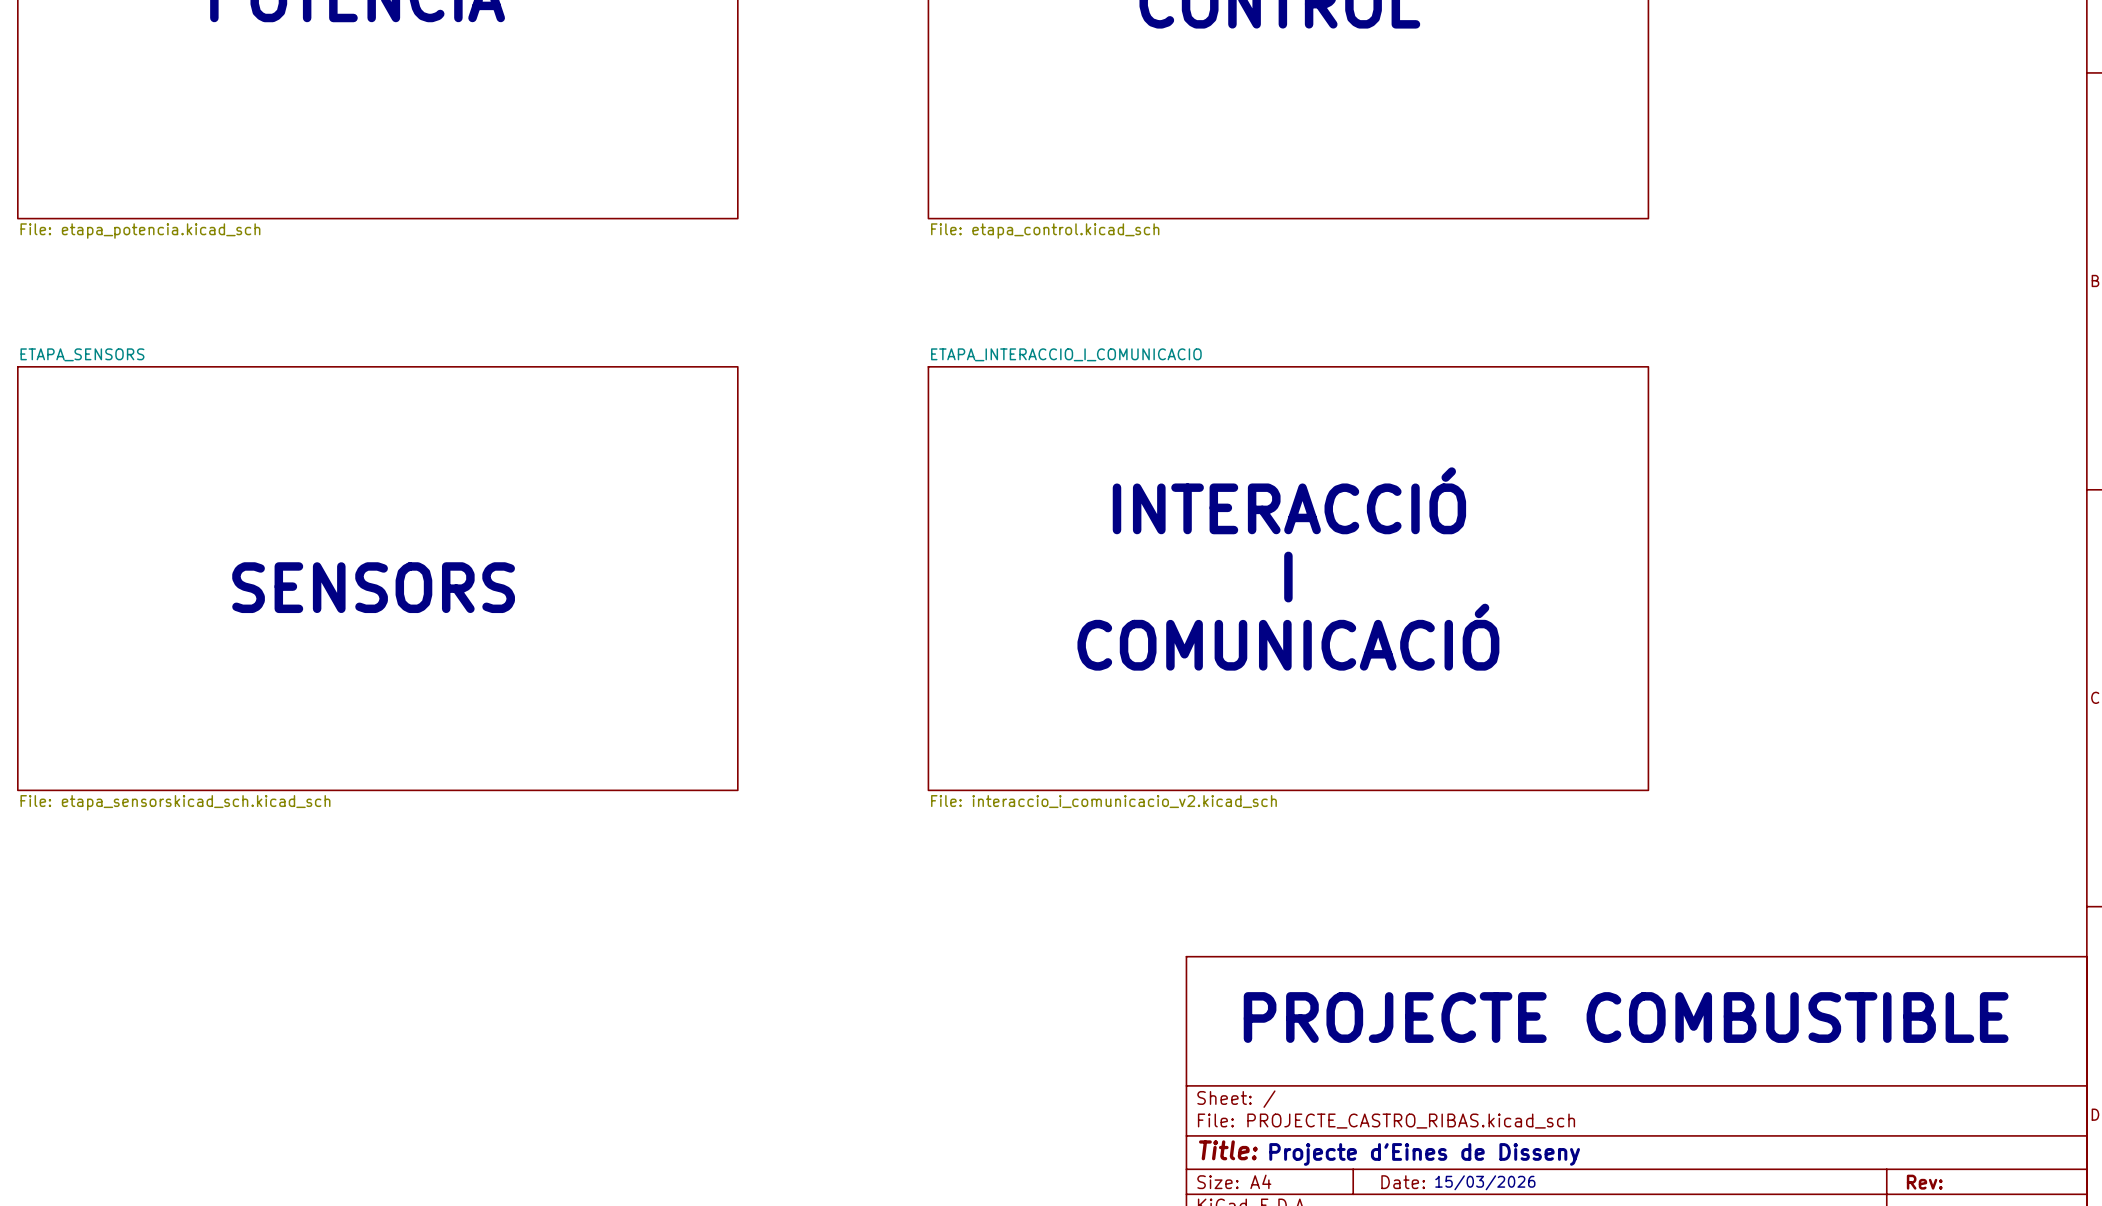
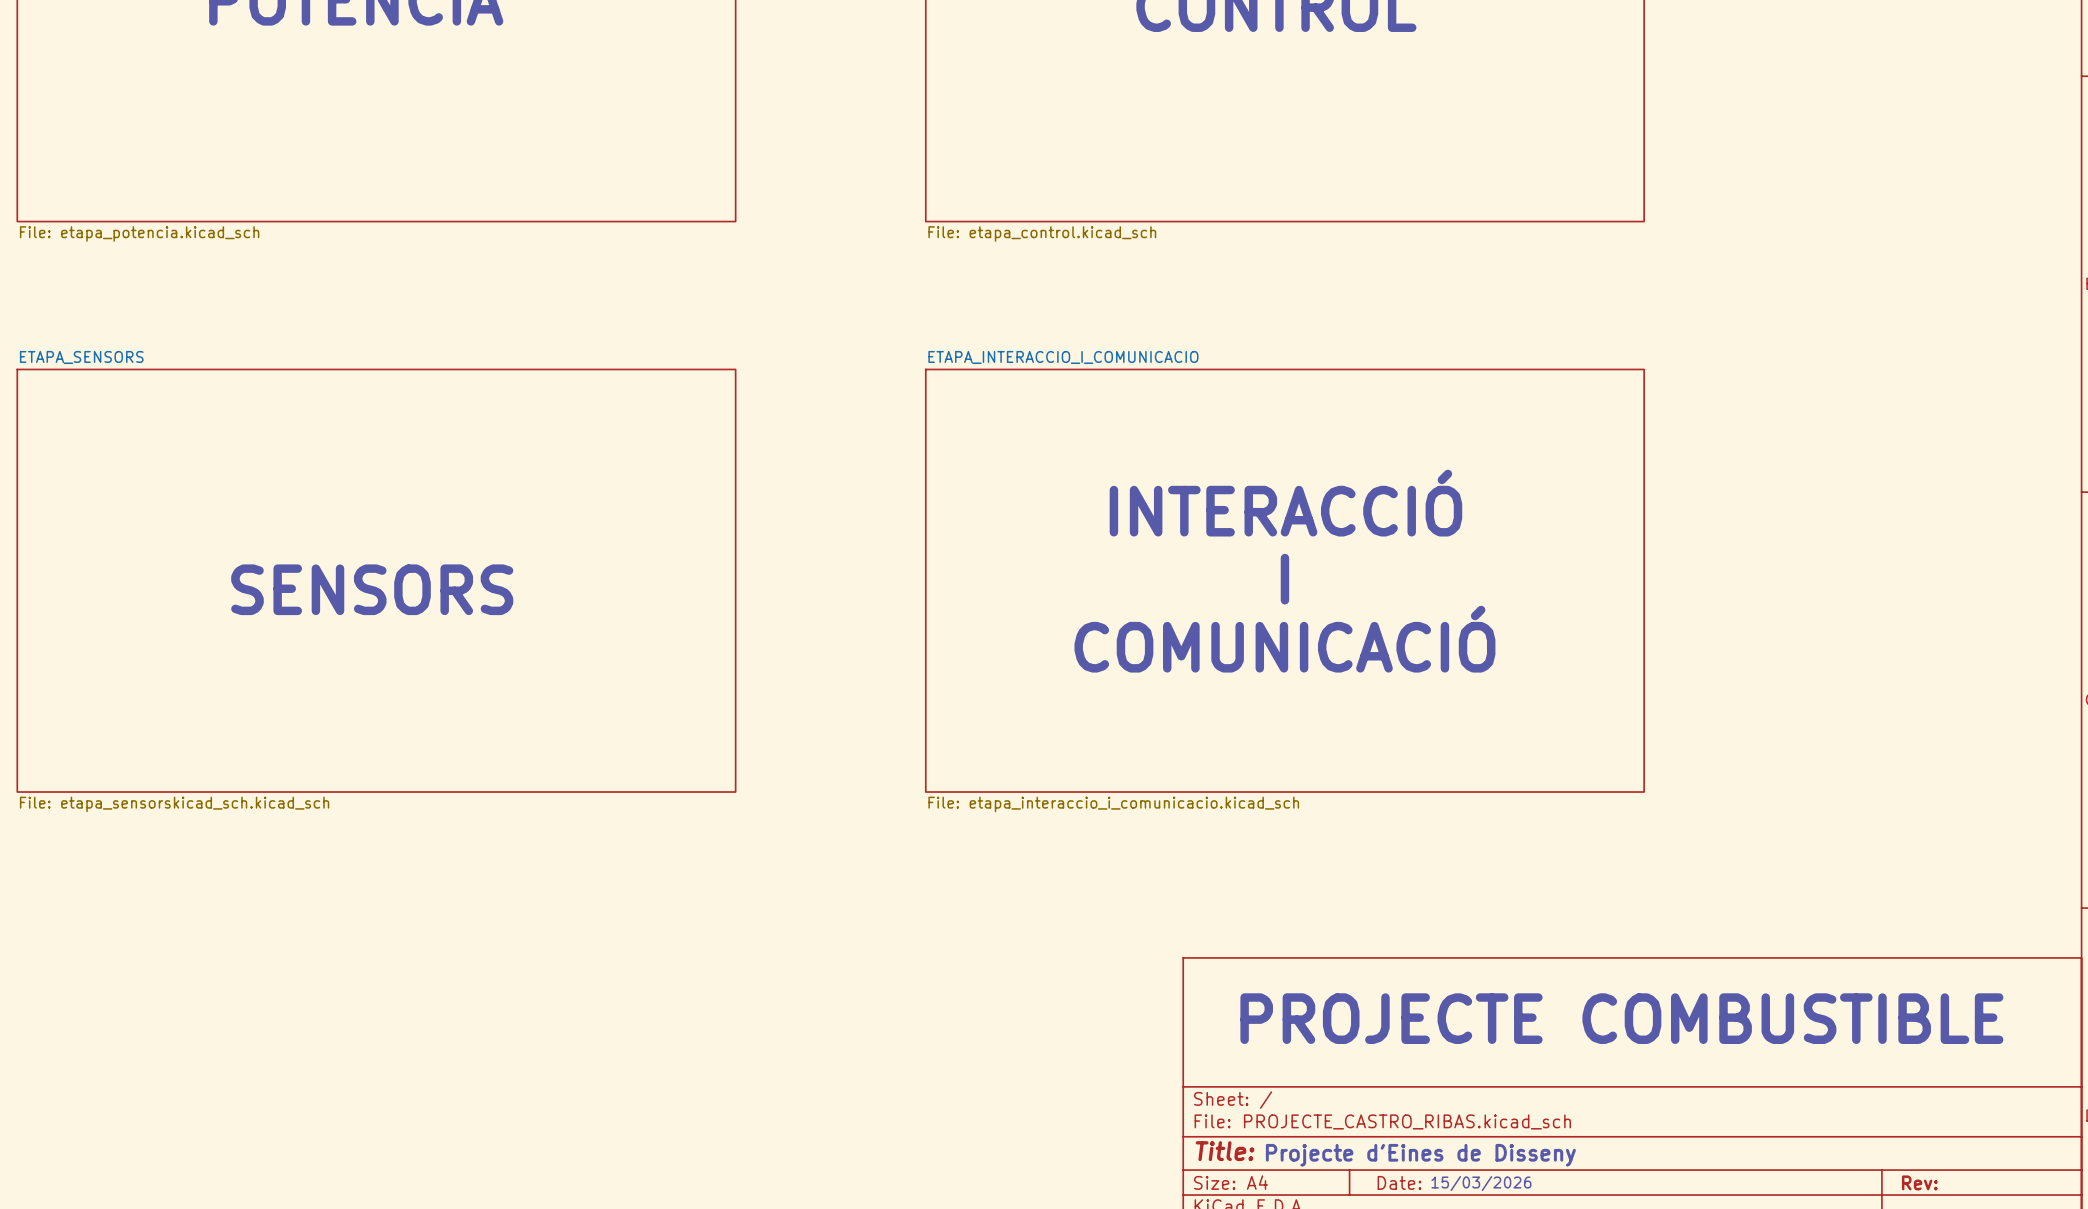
sheet ETAPA_INTERACCIO_I_COMUNICACIO value: File: interaccio_i_comunicacio_v2.kicad_sch (1103, 801) -> File: etapa_interaccio_i_comunicacio.kicad_sch (1113, 804)

